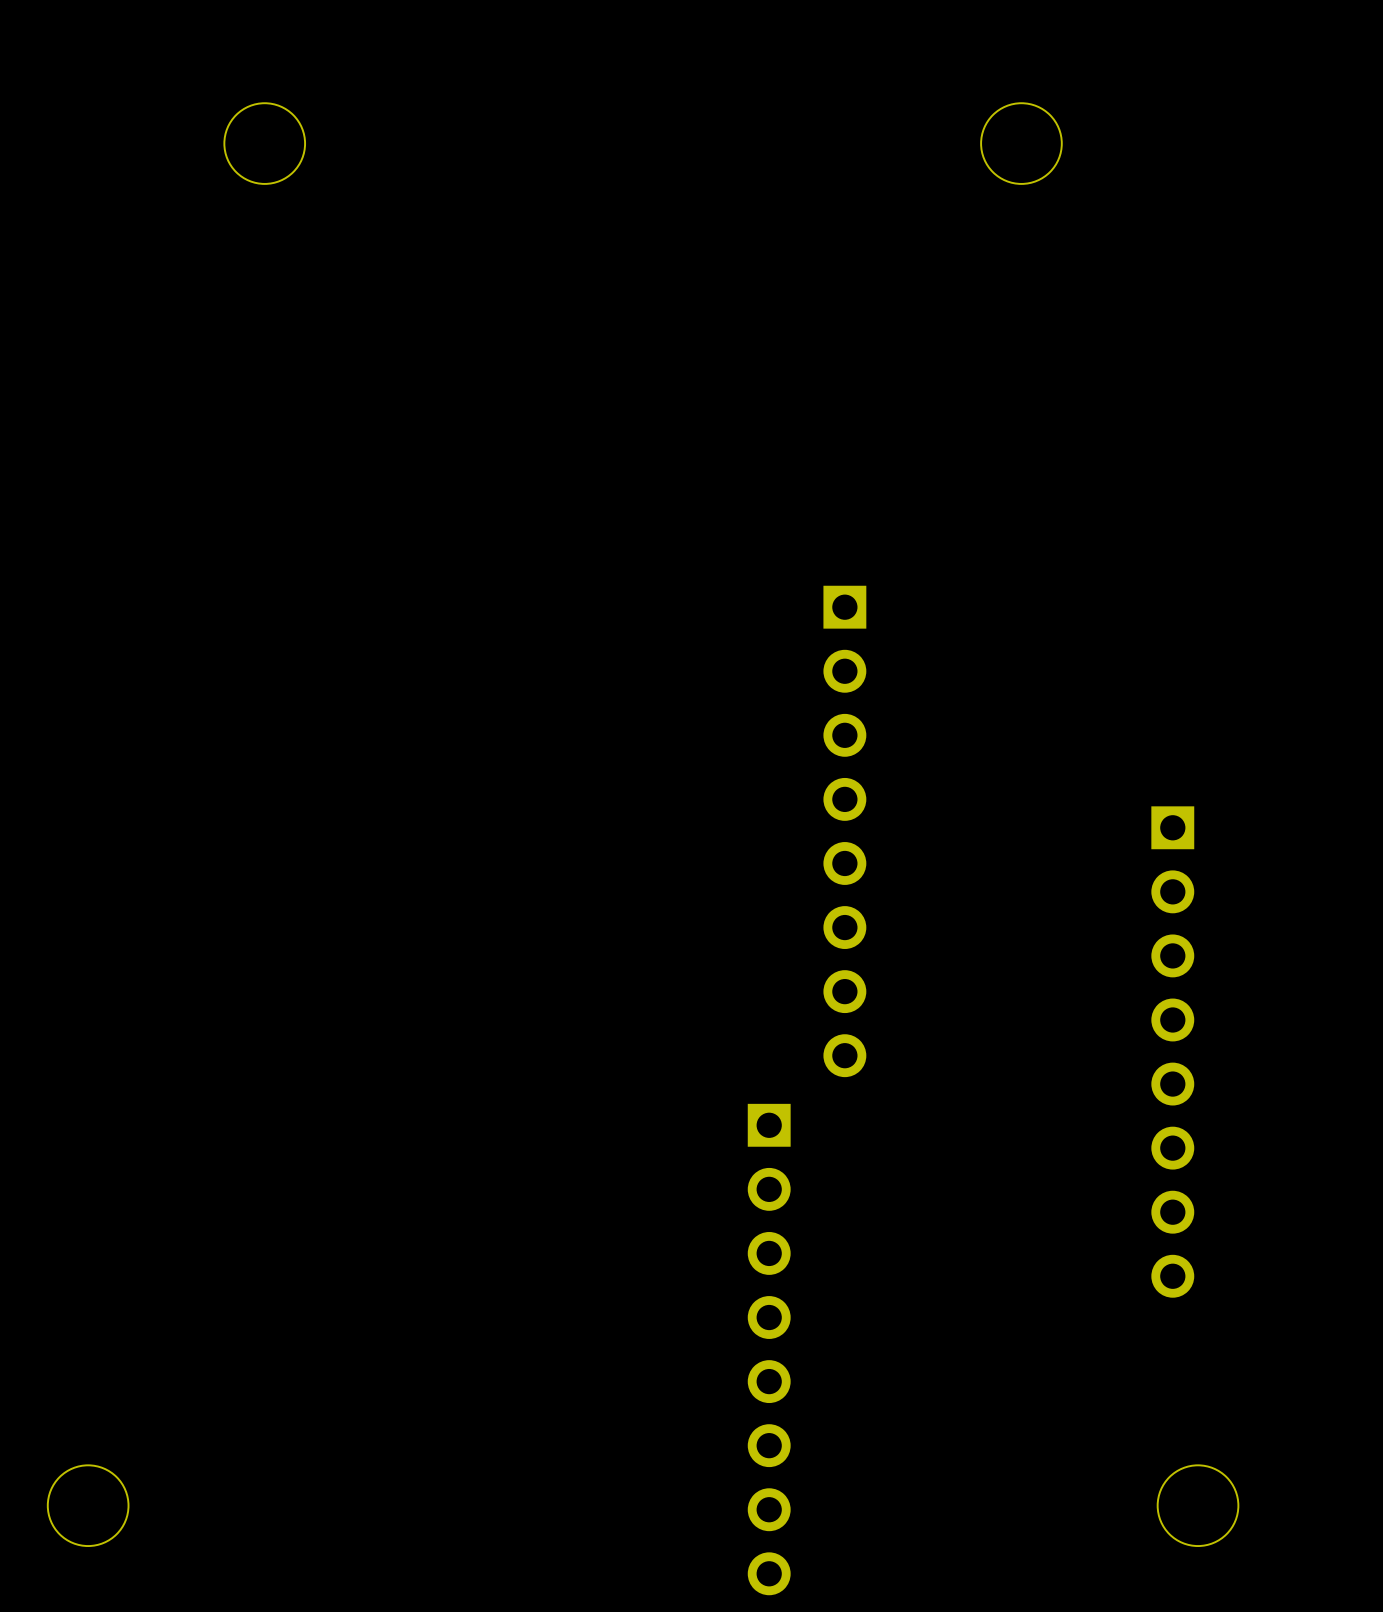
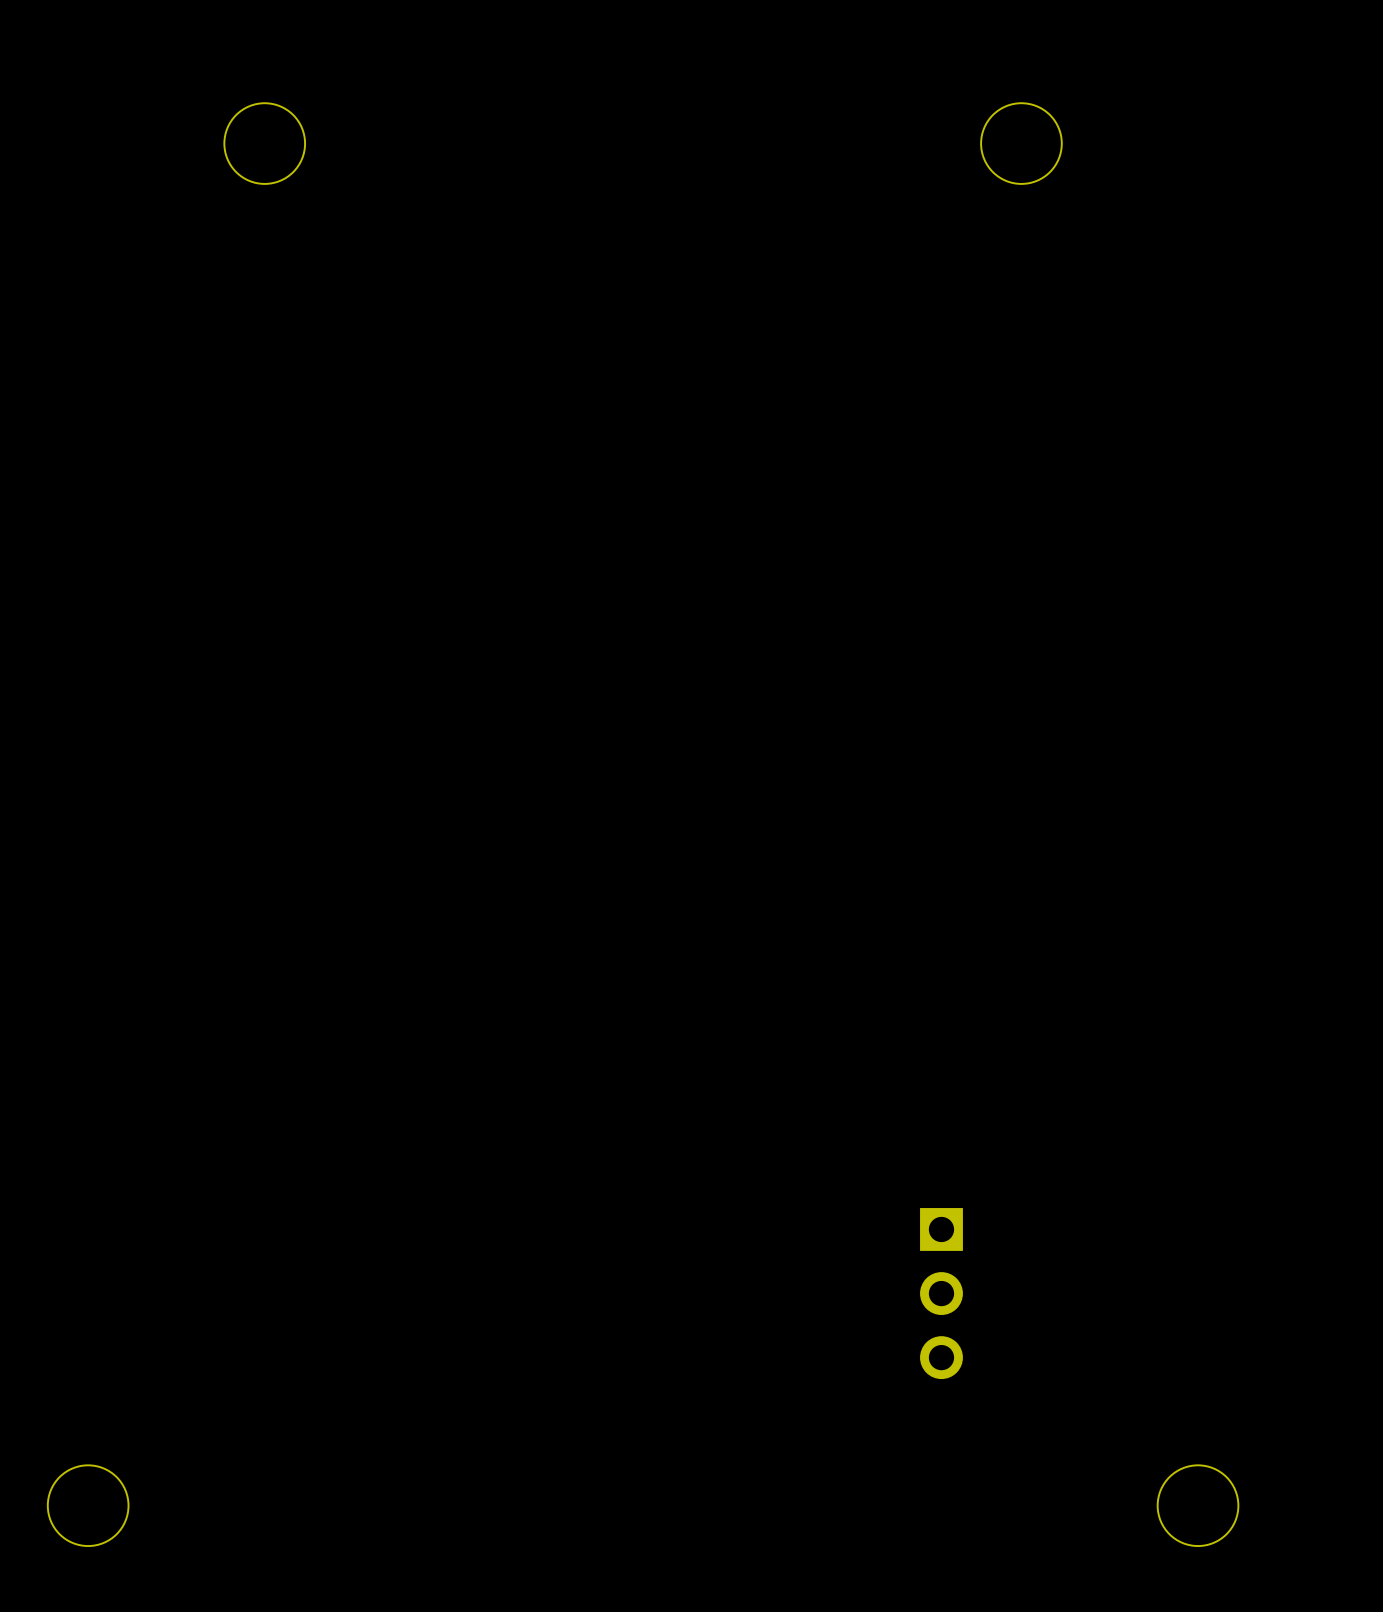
part: (844, 831) -> none
part: (1172, 1052) -> none
part: none -> (941, 1293)
part: (769, 1349) -> none

